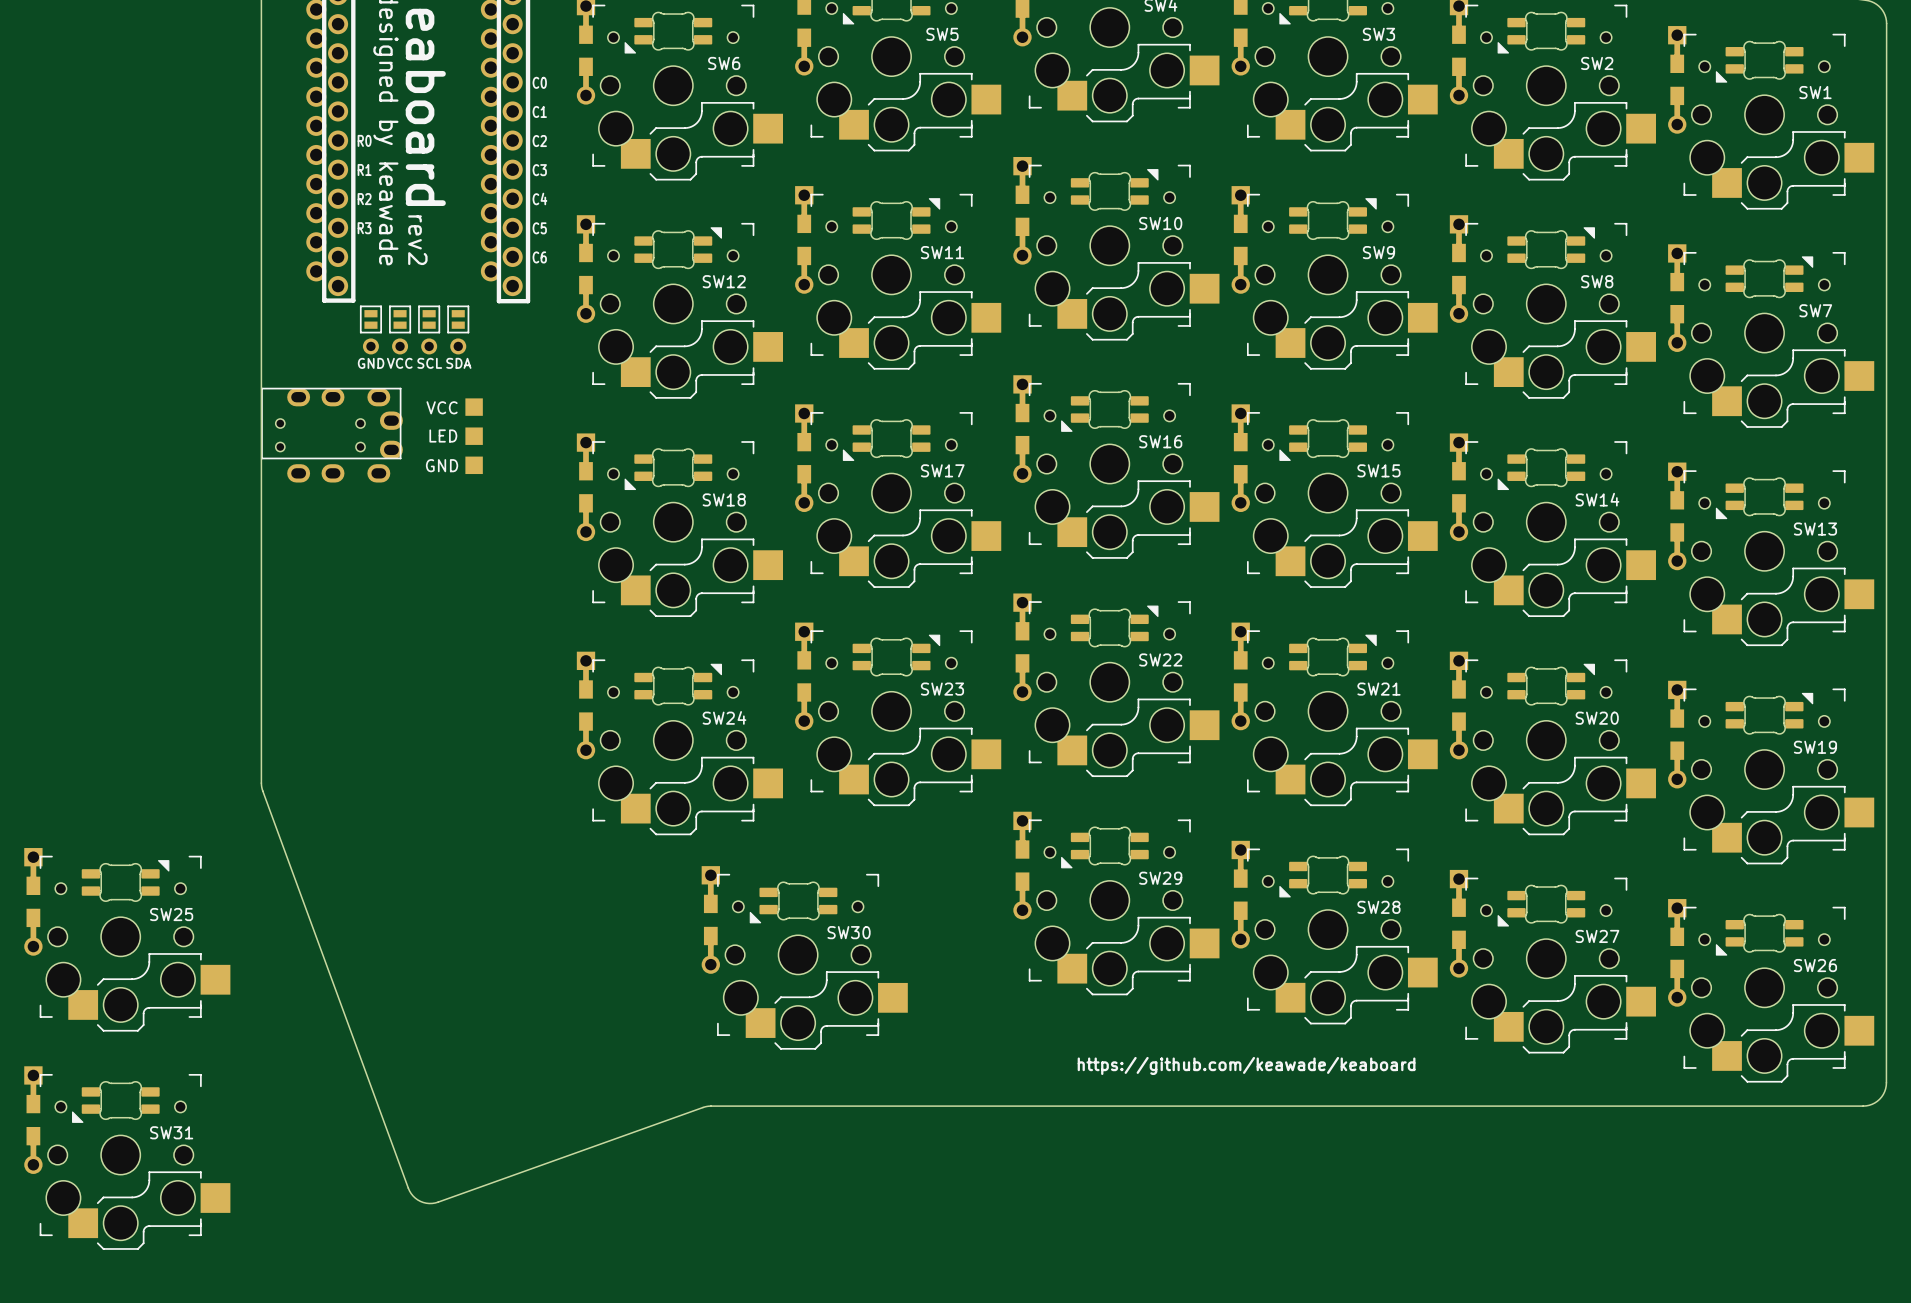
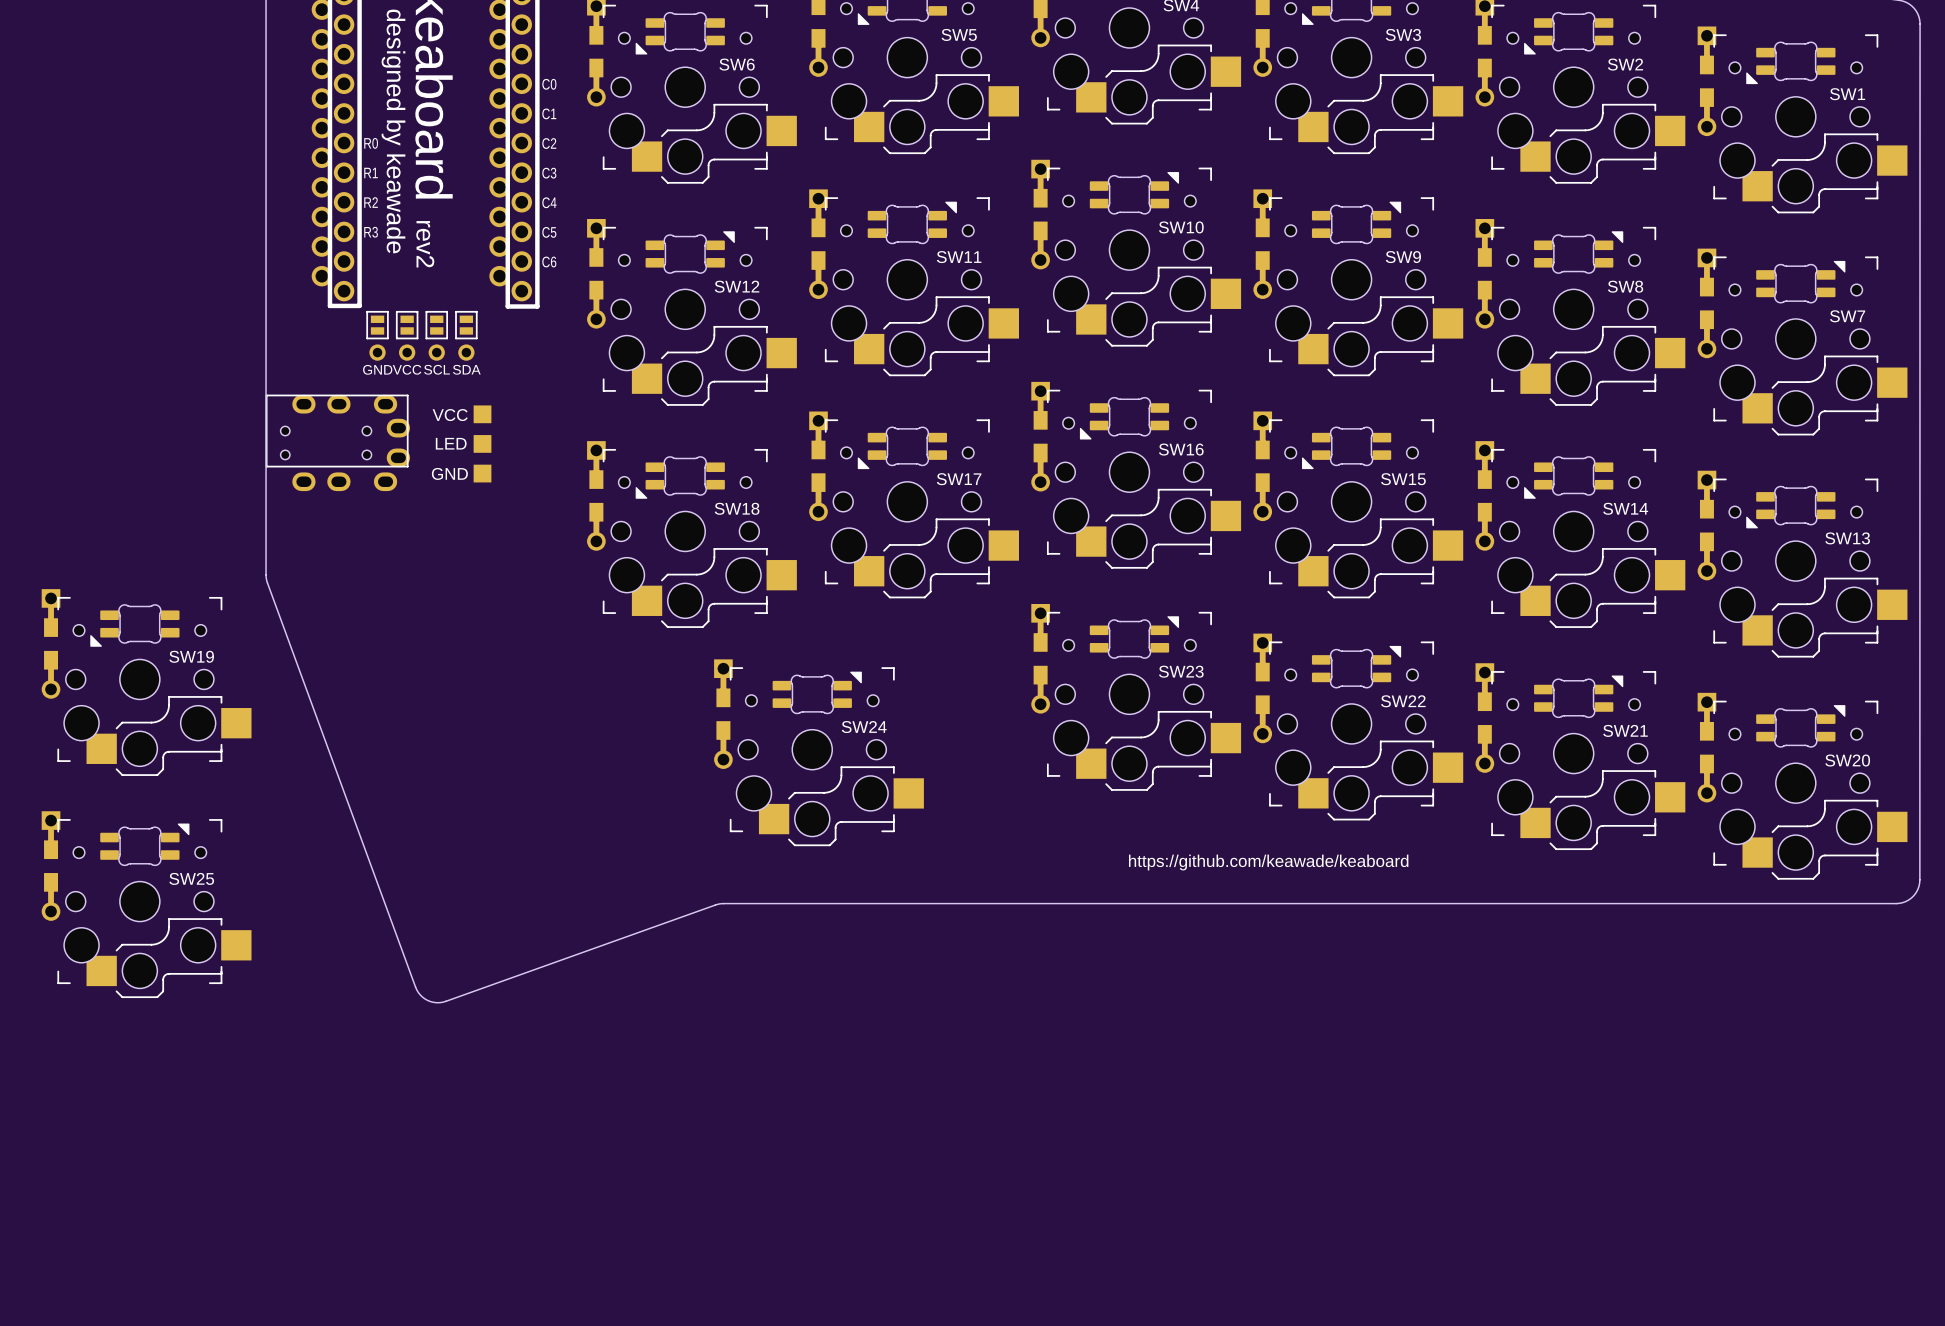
board edge: (261, 564) (262, 789) (408, 1188) (415, 1198) (426, 1203) (438, 1202) (708, 1106) (1869, 1105) (1881, 1096) (1886, 1085) (1886, 864) -> (266, 574) (415, 987) (422, 997) (433, 1002) (445, 1001) (721, 903) (1896, 903) (1905, 901) (1912, 896) (1918, 888) (1919, 879)
part: none -> (134, 625)
part footprint: [795, 622, 814, 731] -> [772, 671, 862, 715]
part: none -> (51, 643)
part: (896, 655) -> none
SW22 name: SW22 (1160, 659) -> SW23 (1181, 671)
SW19: none -> (154, 686)
part: (678, 684) -> none
SW21 name: SW21 (1378, 689) -> SW22 (1403, 701)
part: none -> (723, 714)
part: (586, 705) -> none
SW23: (905, 718) -> none
SW20 name: SW20 (1597, 718) -> SW21 (1625, 730)
SW24 position: (687, 747) -> (826, 756)
SW19 name: SW19 (1815, 747) -> SW20 (1847, 760)
part: (1104, 847) -> none
part: (1022, 865) -> none
part: (1323, 876) -> none
part position: (125, 880) -> (144, 844)
part: (1240, 894) -> none
part position: (33, 901) -> (51, 866)
part: (793, 902) -> none
part: (1541, 905) -> none
SW29: (1124, 907) -> none
part: (710, 919) -> none
part: (1458, 923) -> none
part: (1759, 934) -> none
SW28: (1342, 936) -> none
SW25 position: (135, 943) -> (154, 908)
part: (1677, 952) -> none
SW30: (812, 961) -> none
SW27: (1560, 965) -> none
SW26: (1778, 994) -> none
text position: https://github.com/keawade/keaboard (1246, 1065) -> https://github.com/keawade/keaboard (1268, 862)
part: (115, 1102) -> none
part: (33, 1120) -> none
SW31: (135, 1161) -> none

